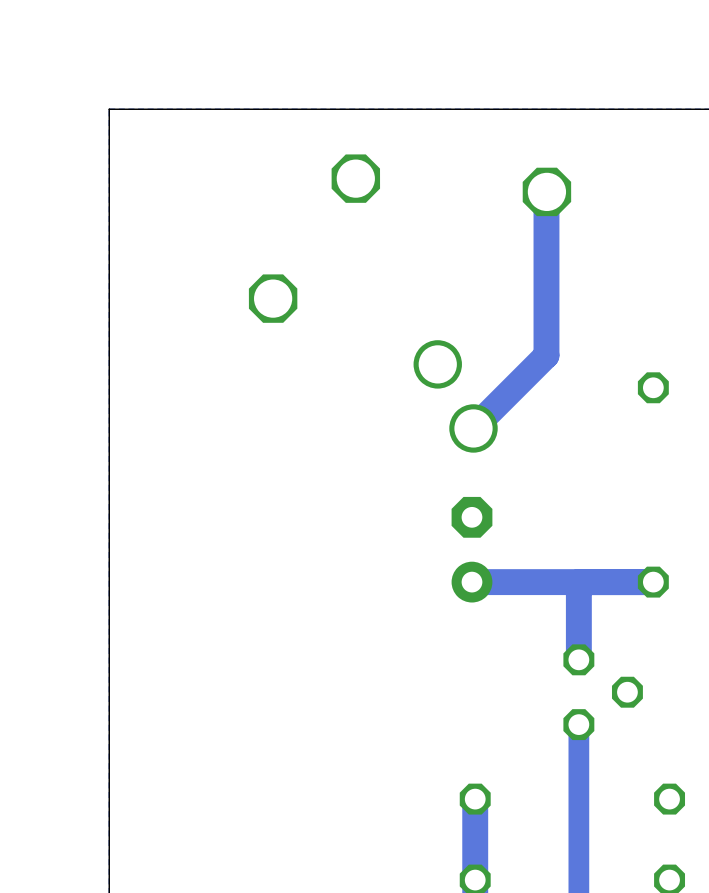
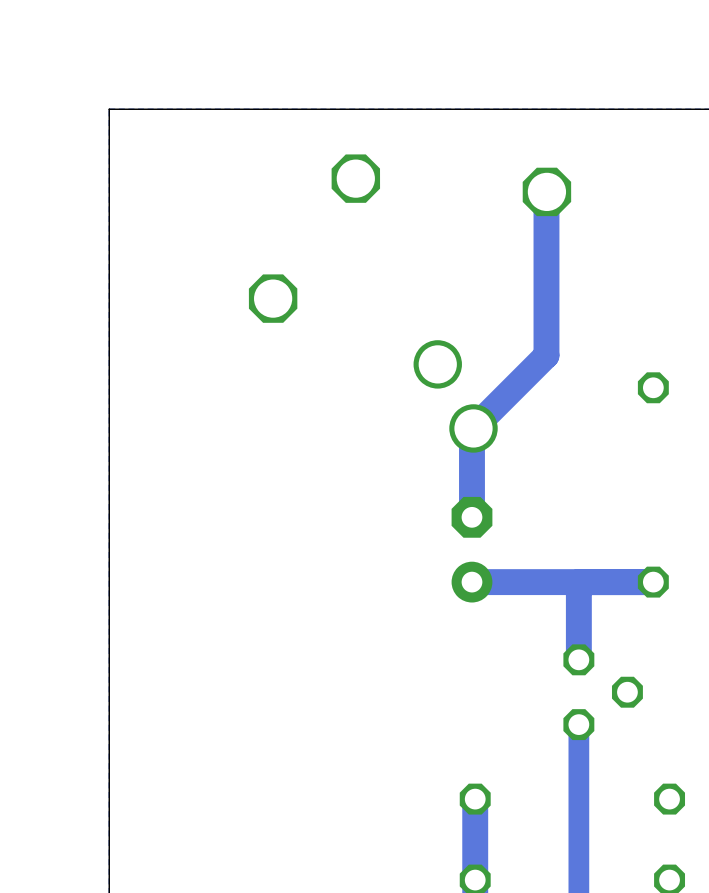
track: none -> (473, 428) (471, 517)

